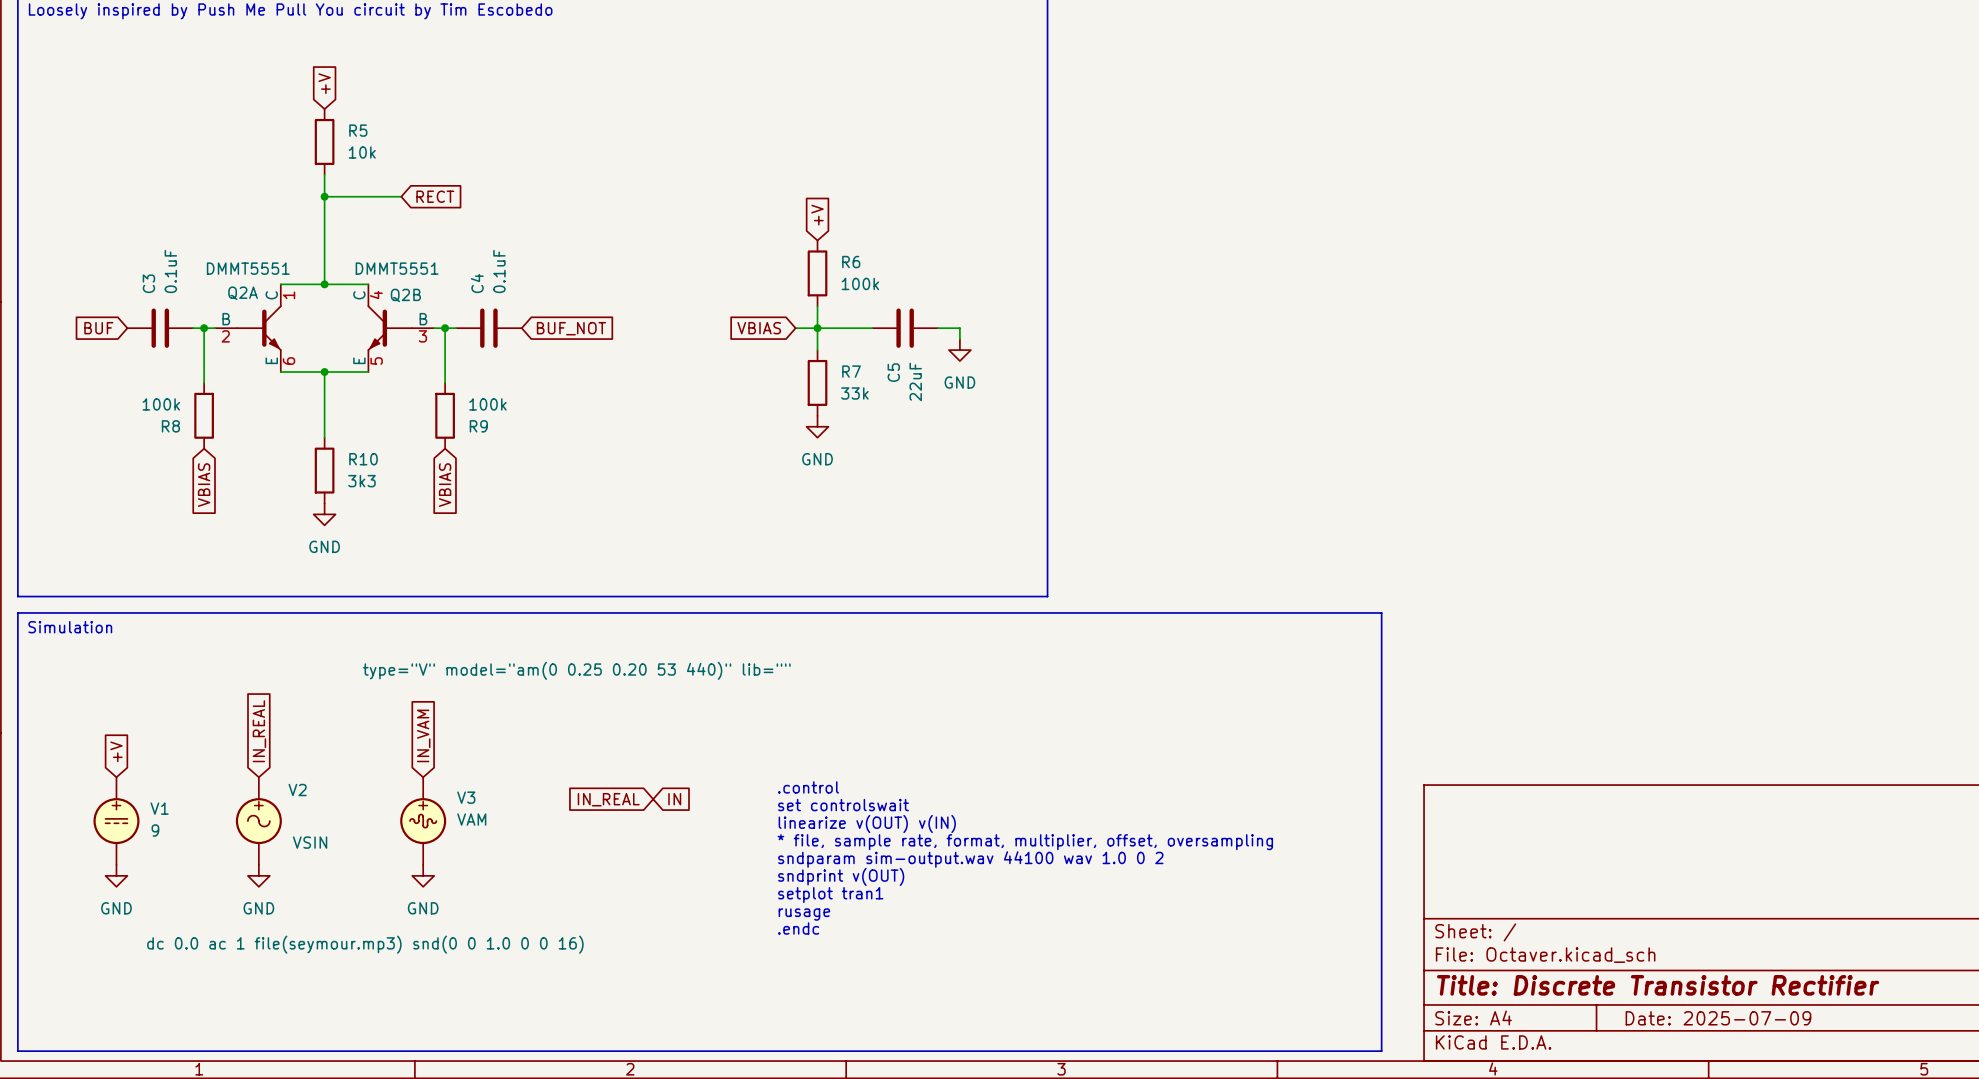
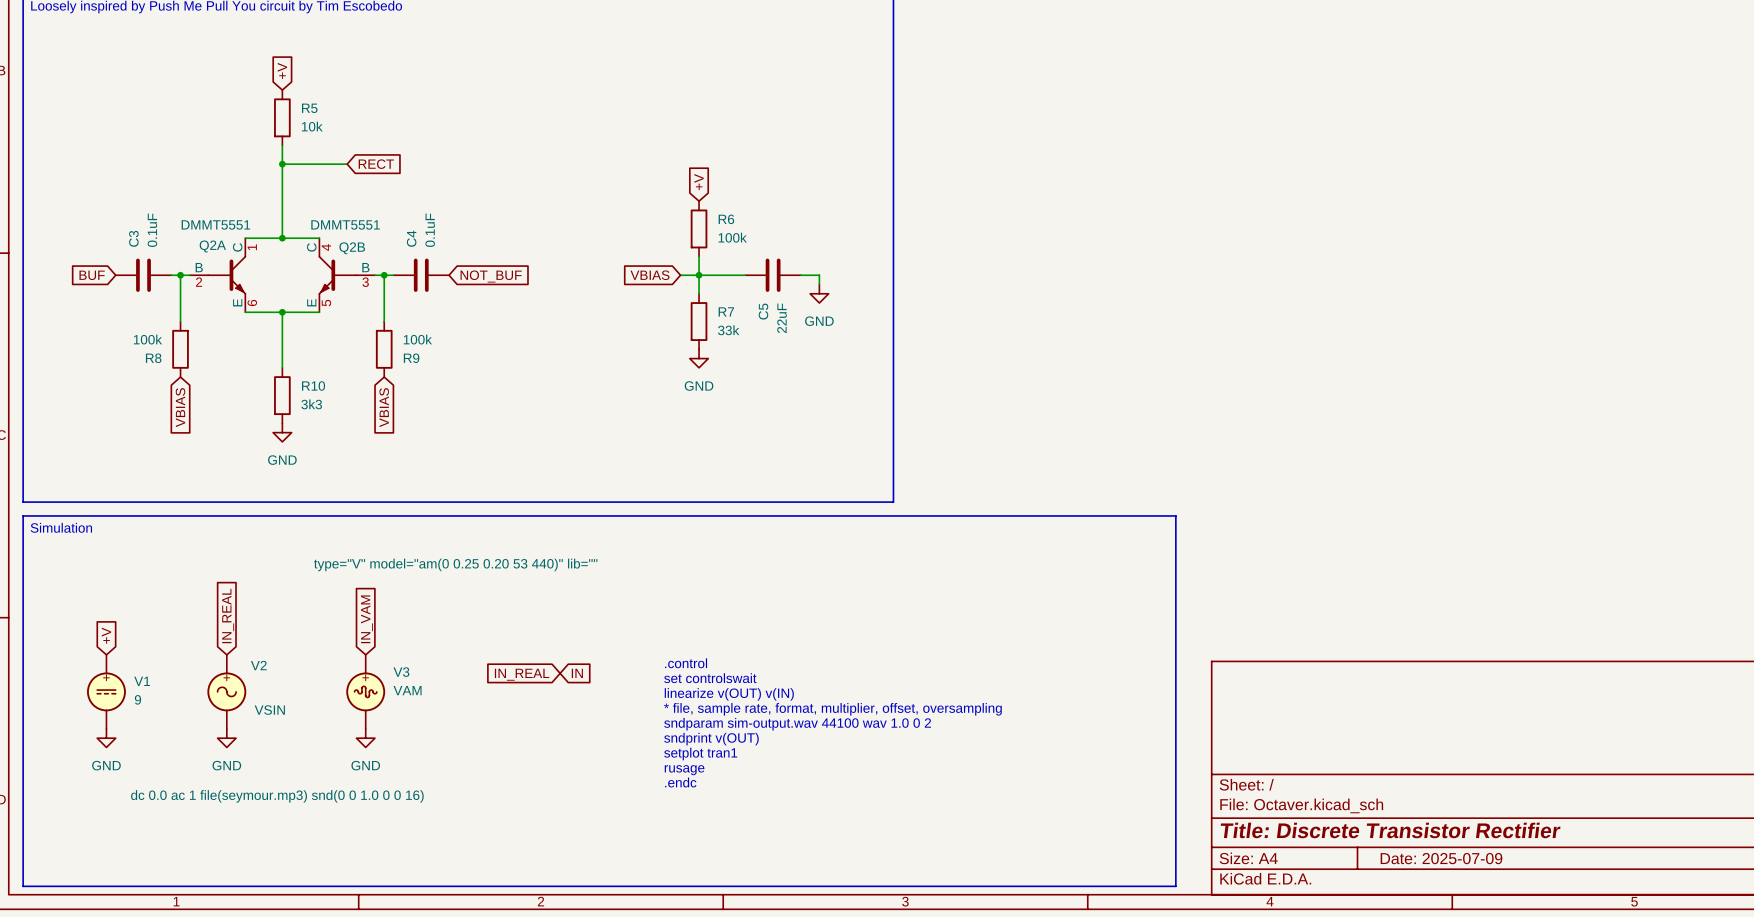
global label: BUF_NOT (571, 328) -> NOT_BUF (491, 276)

